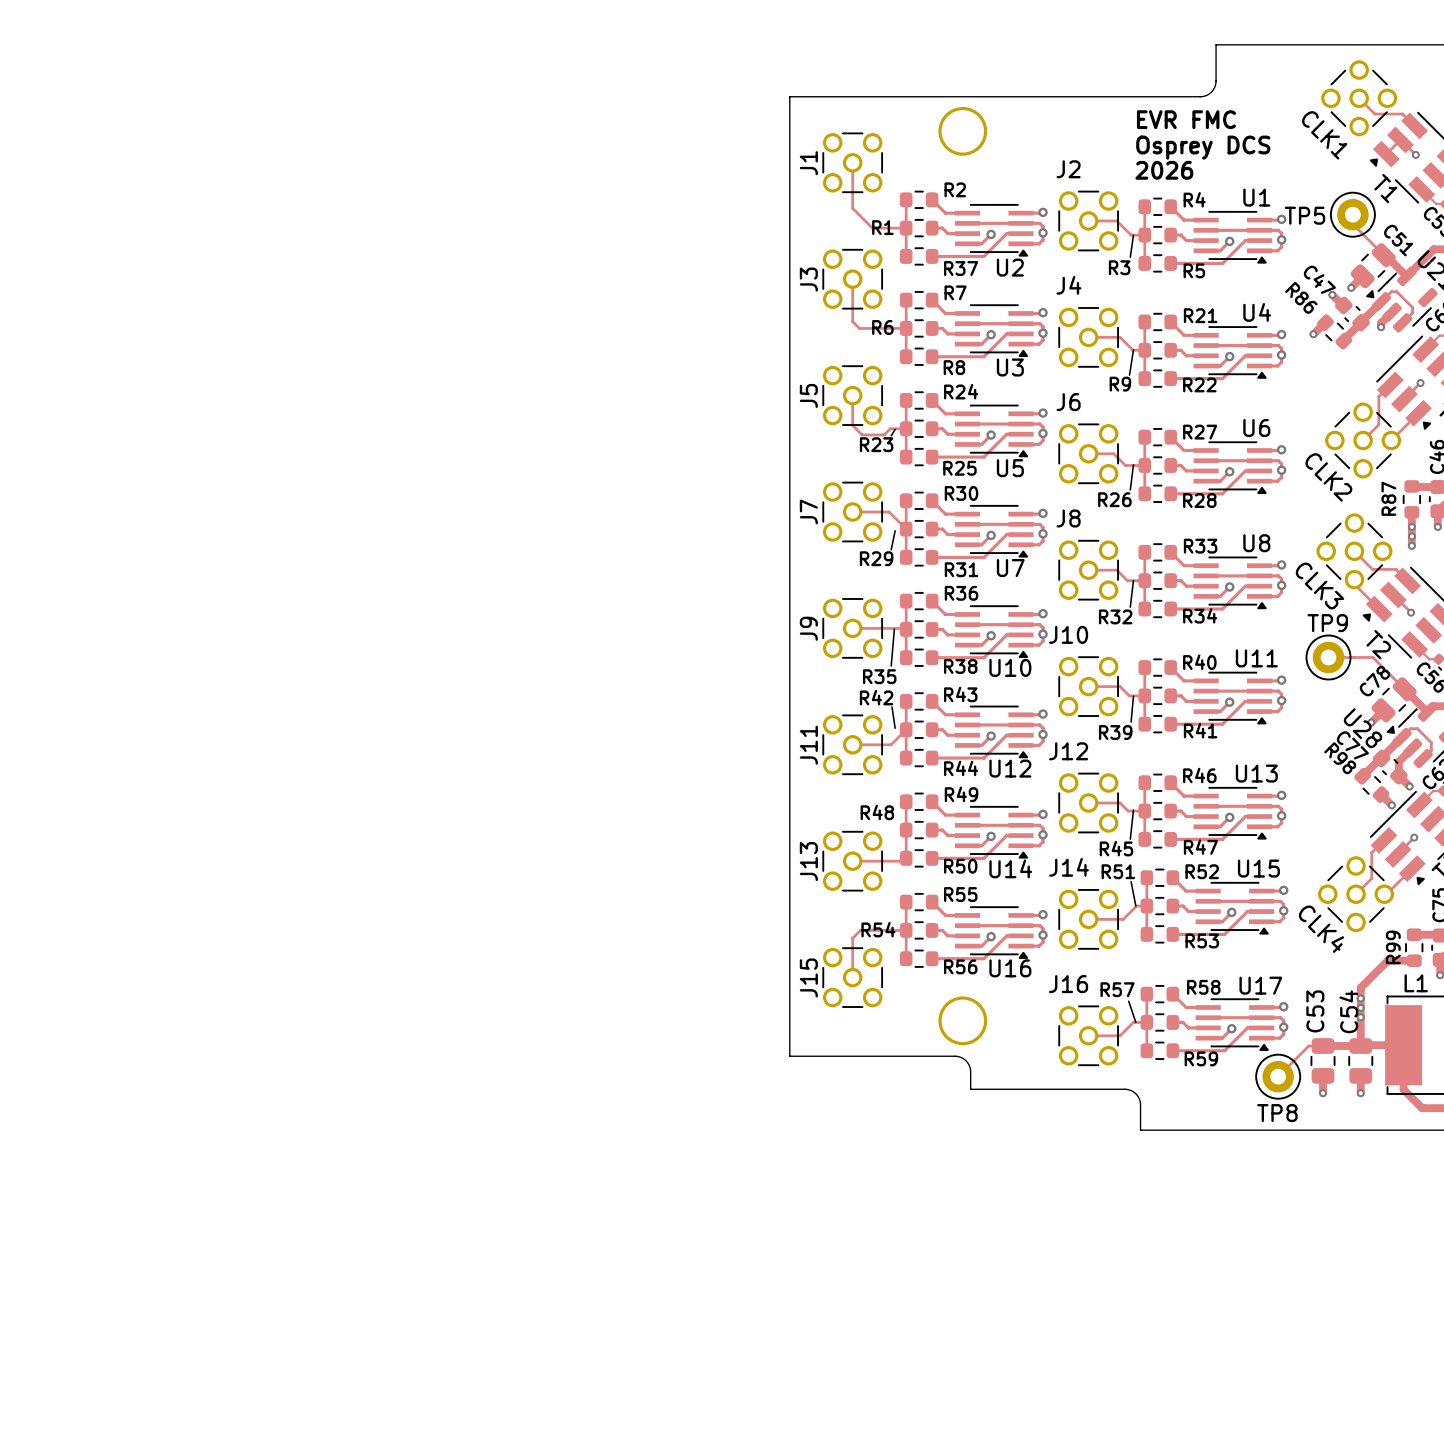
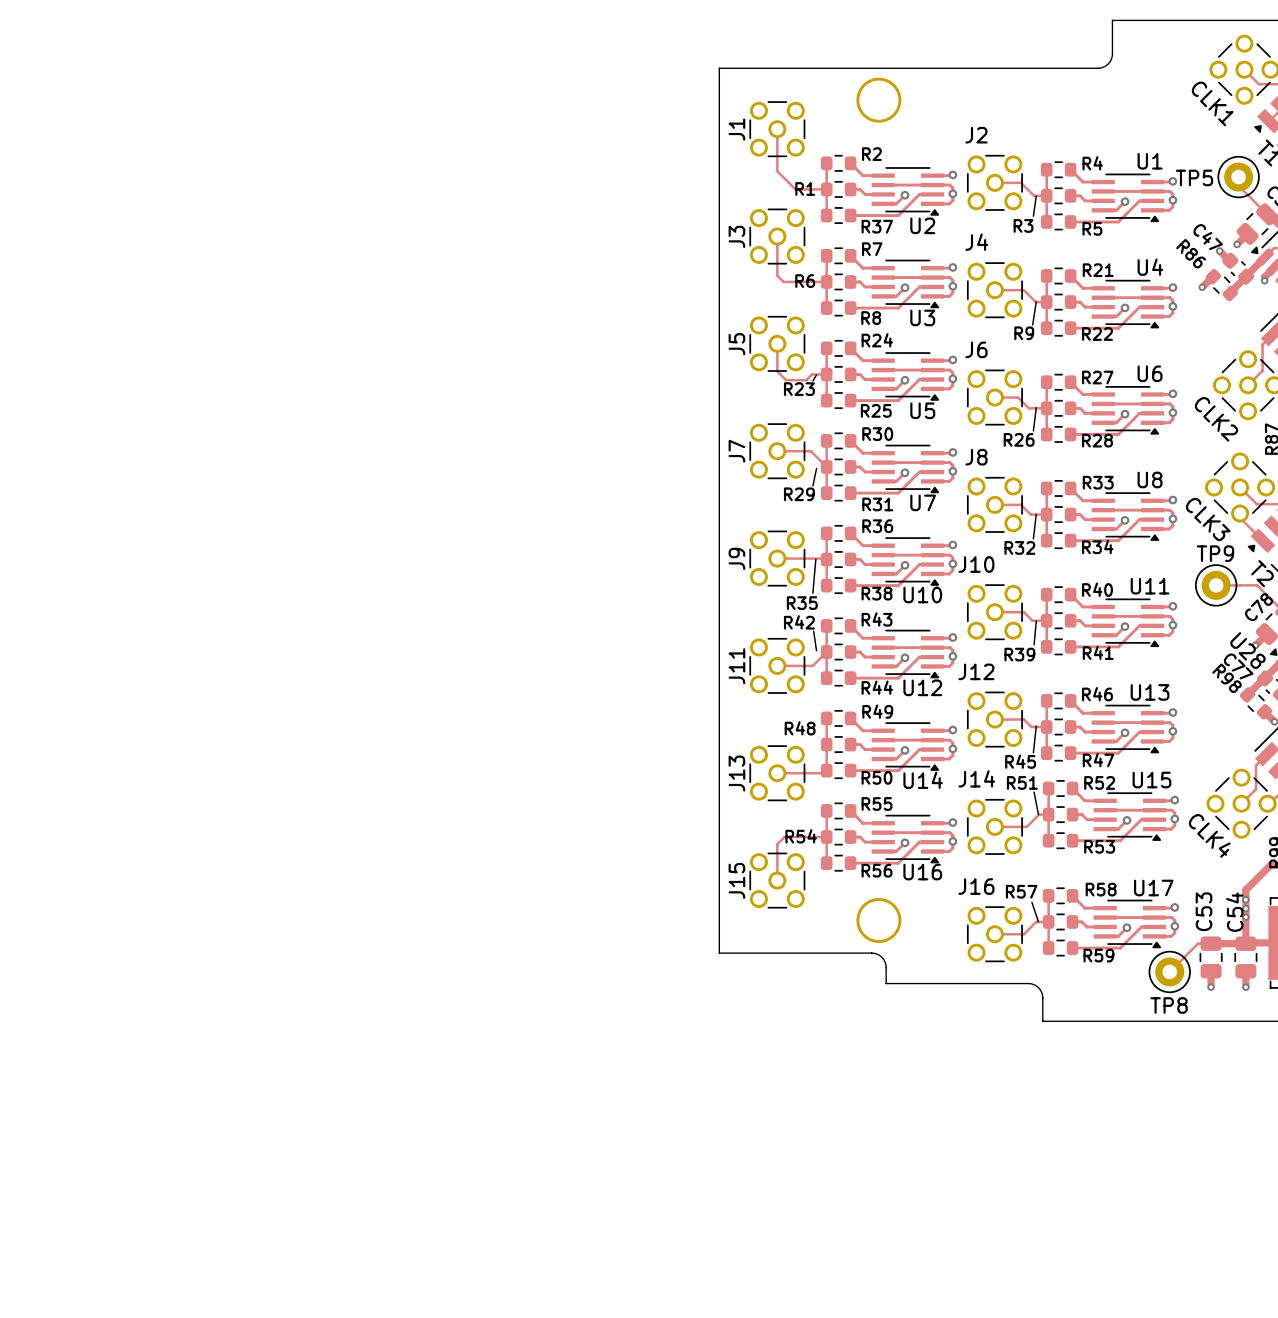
text: EVR FMC (1186, 119) -> none
text: Osprey DCS (1203, 147) -> none
text: 2026 (1164, 170) -> none

